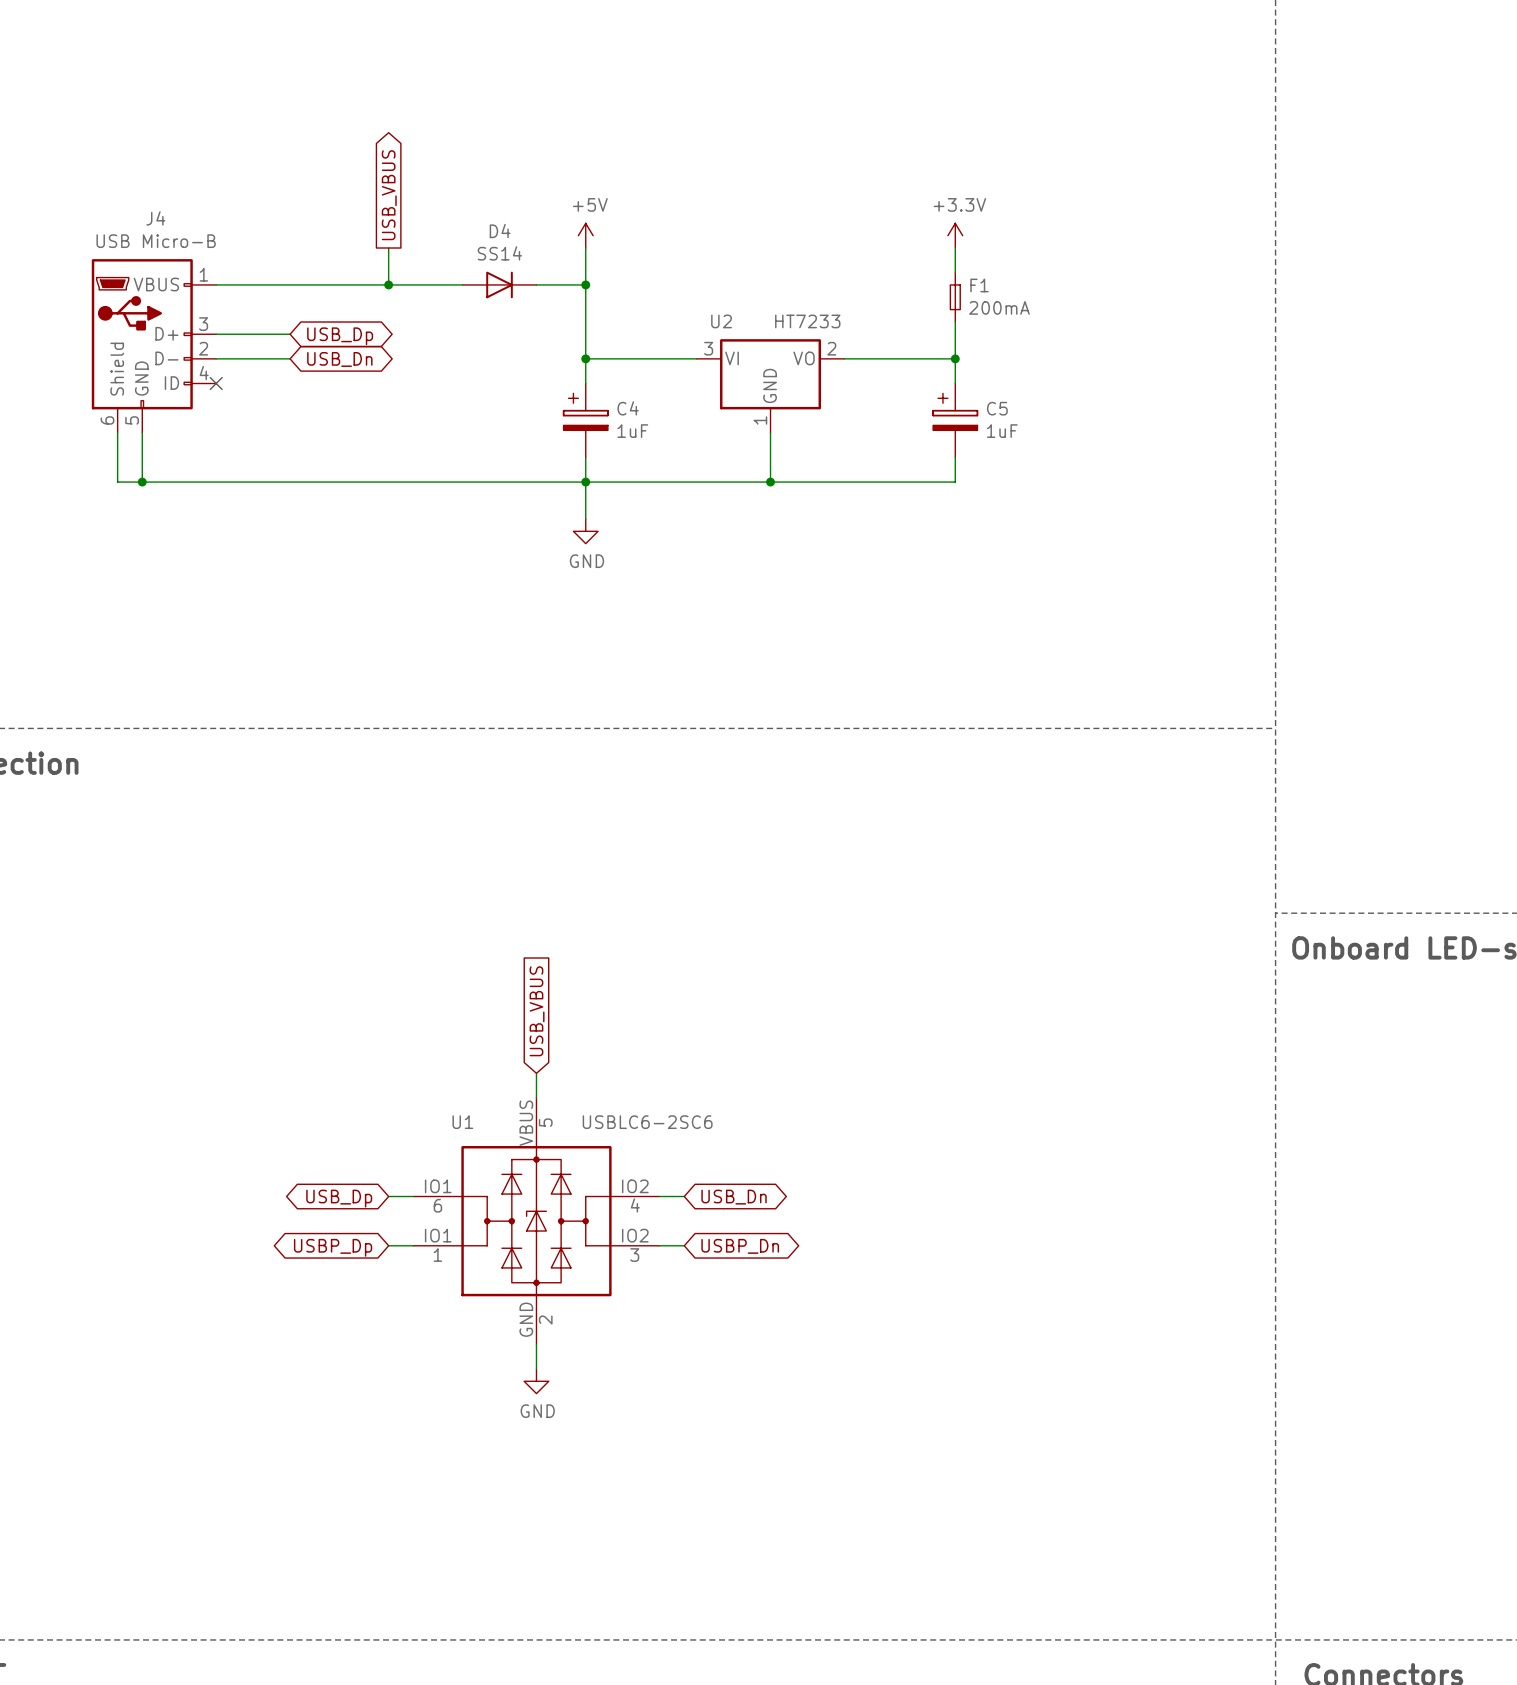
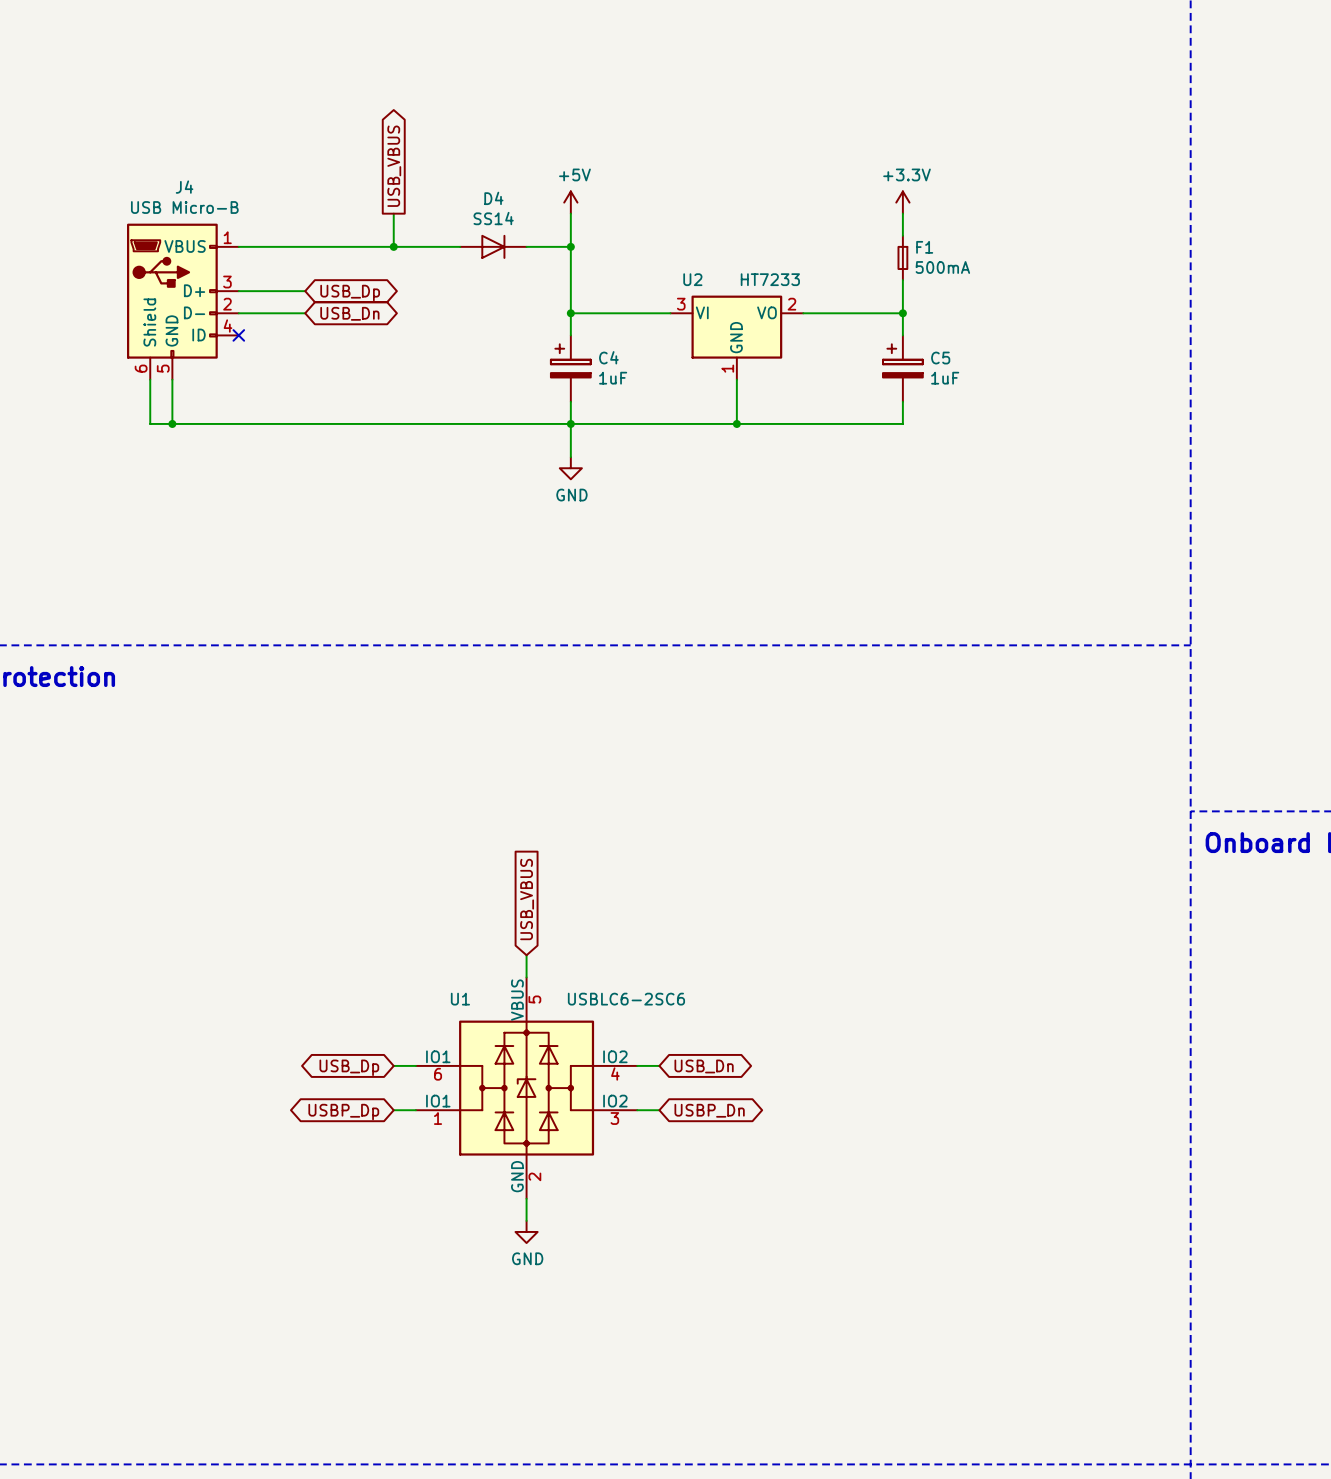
F1 value: 200mA (999, 307) -> 500mA (942, 267)

